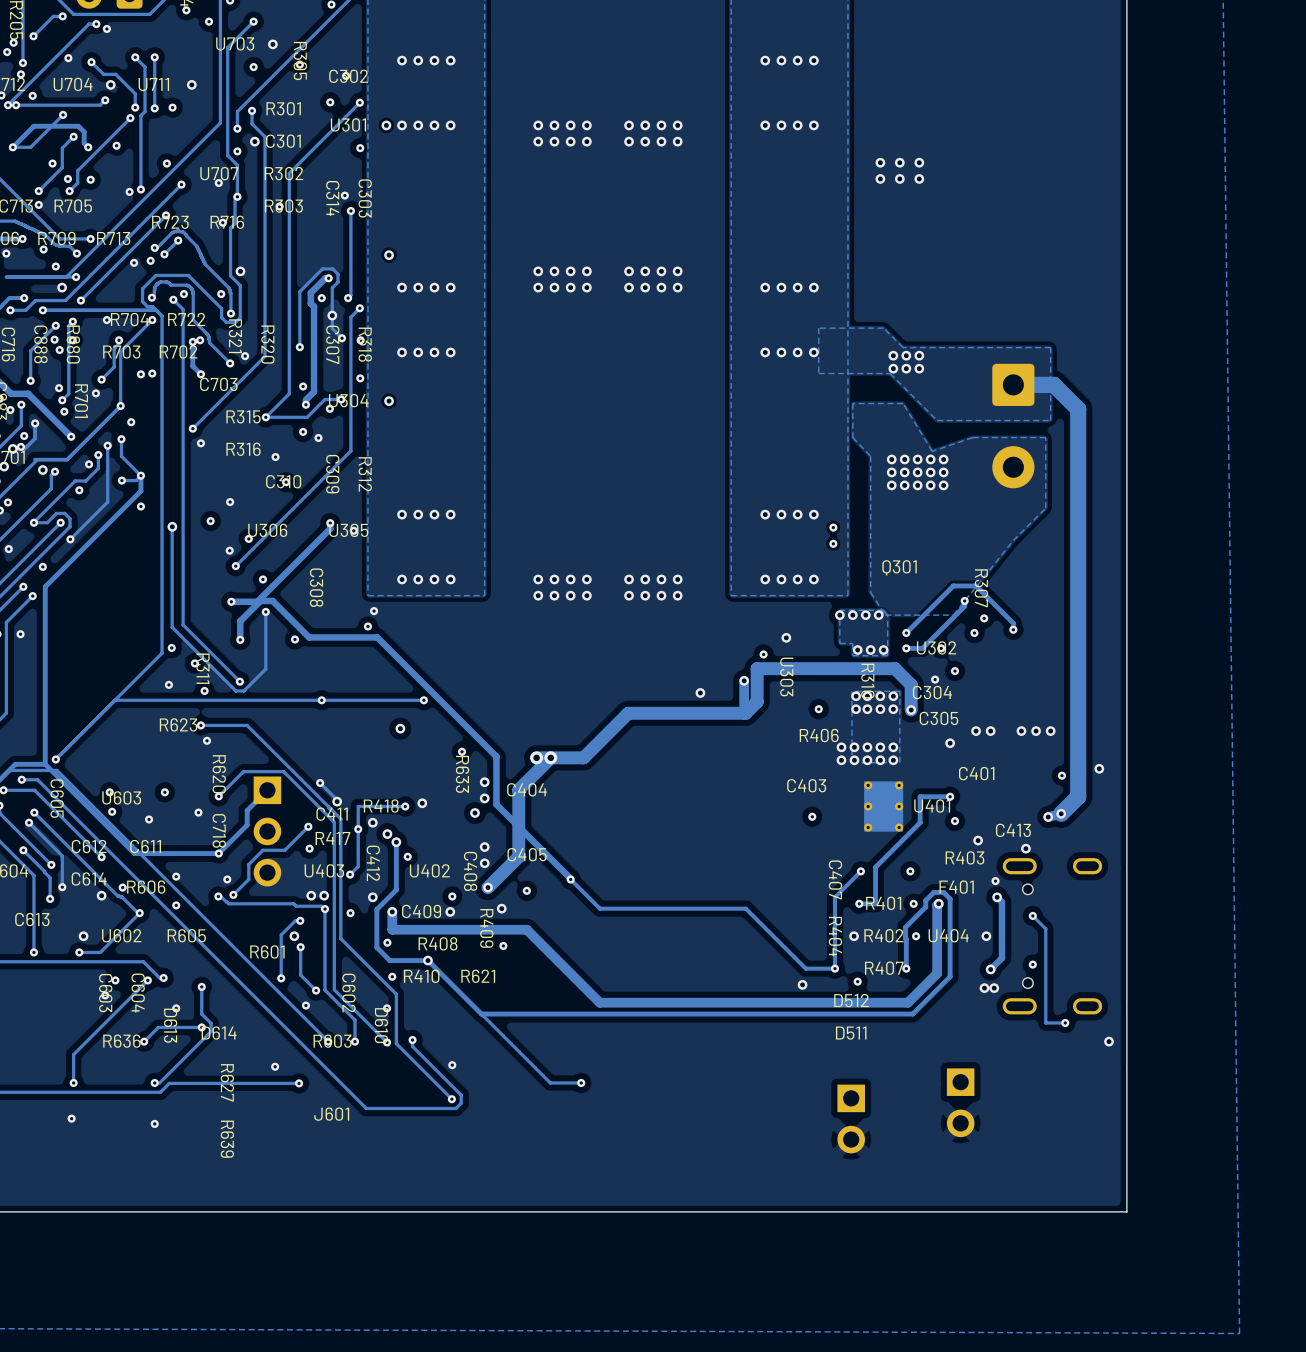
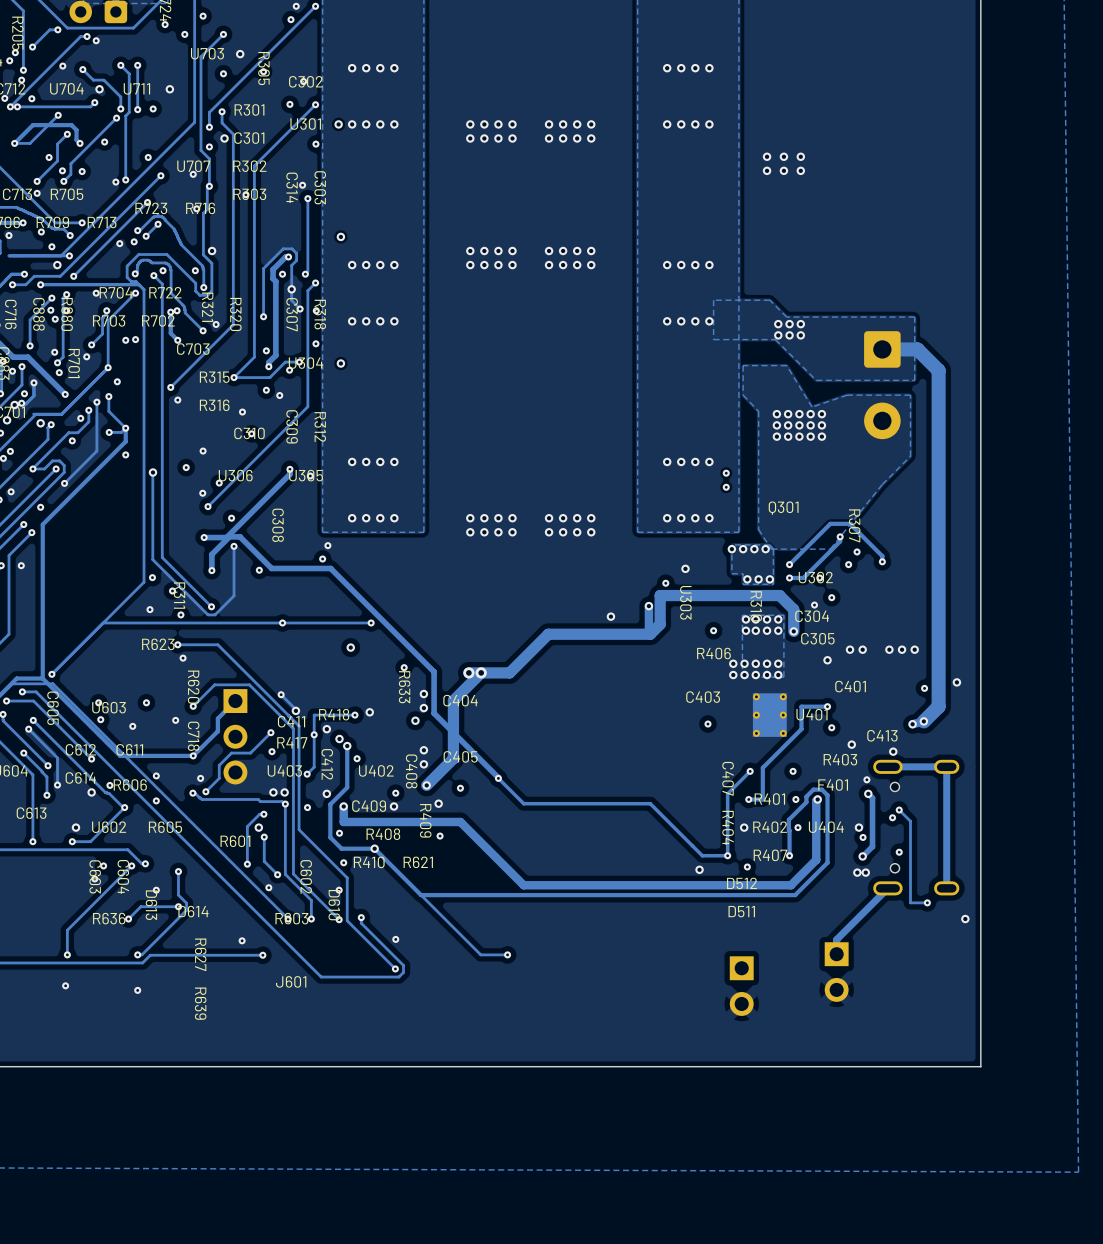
track: none -> (887, 766) (946, 766) (946, 888)
via: none -> (892, 817)
via: none -> (863, 837)
track: none -> (887, 888) (836, 939) (836, 954)

